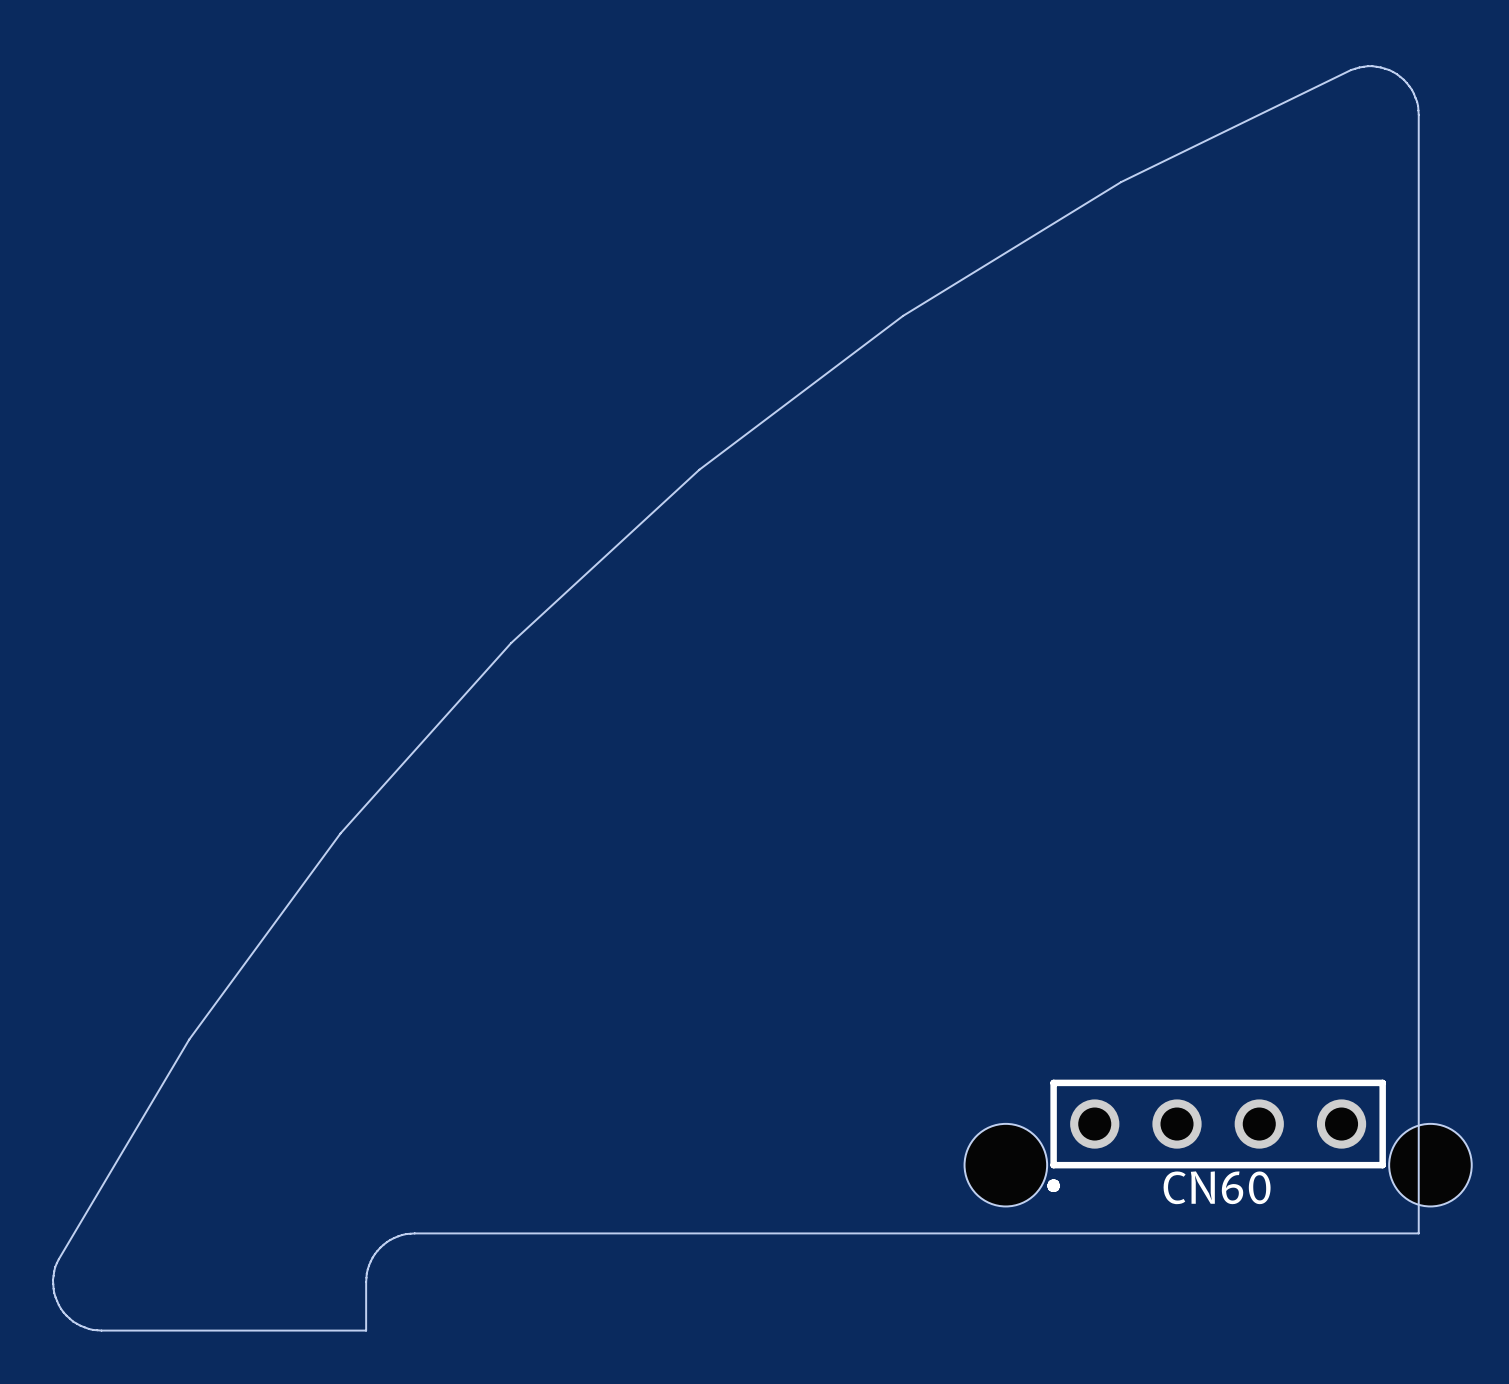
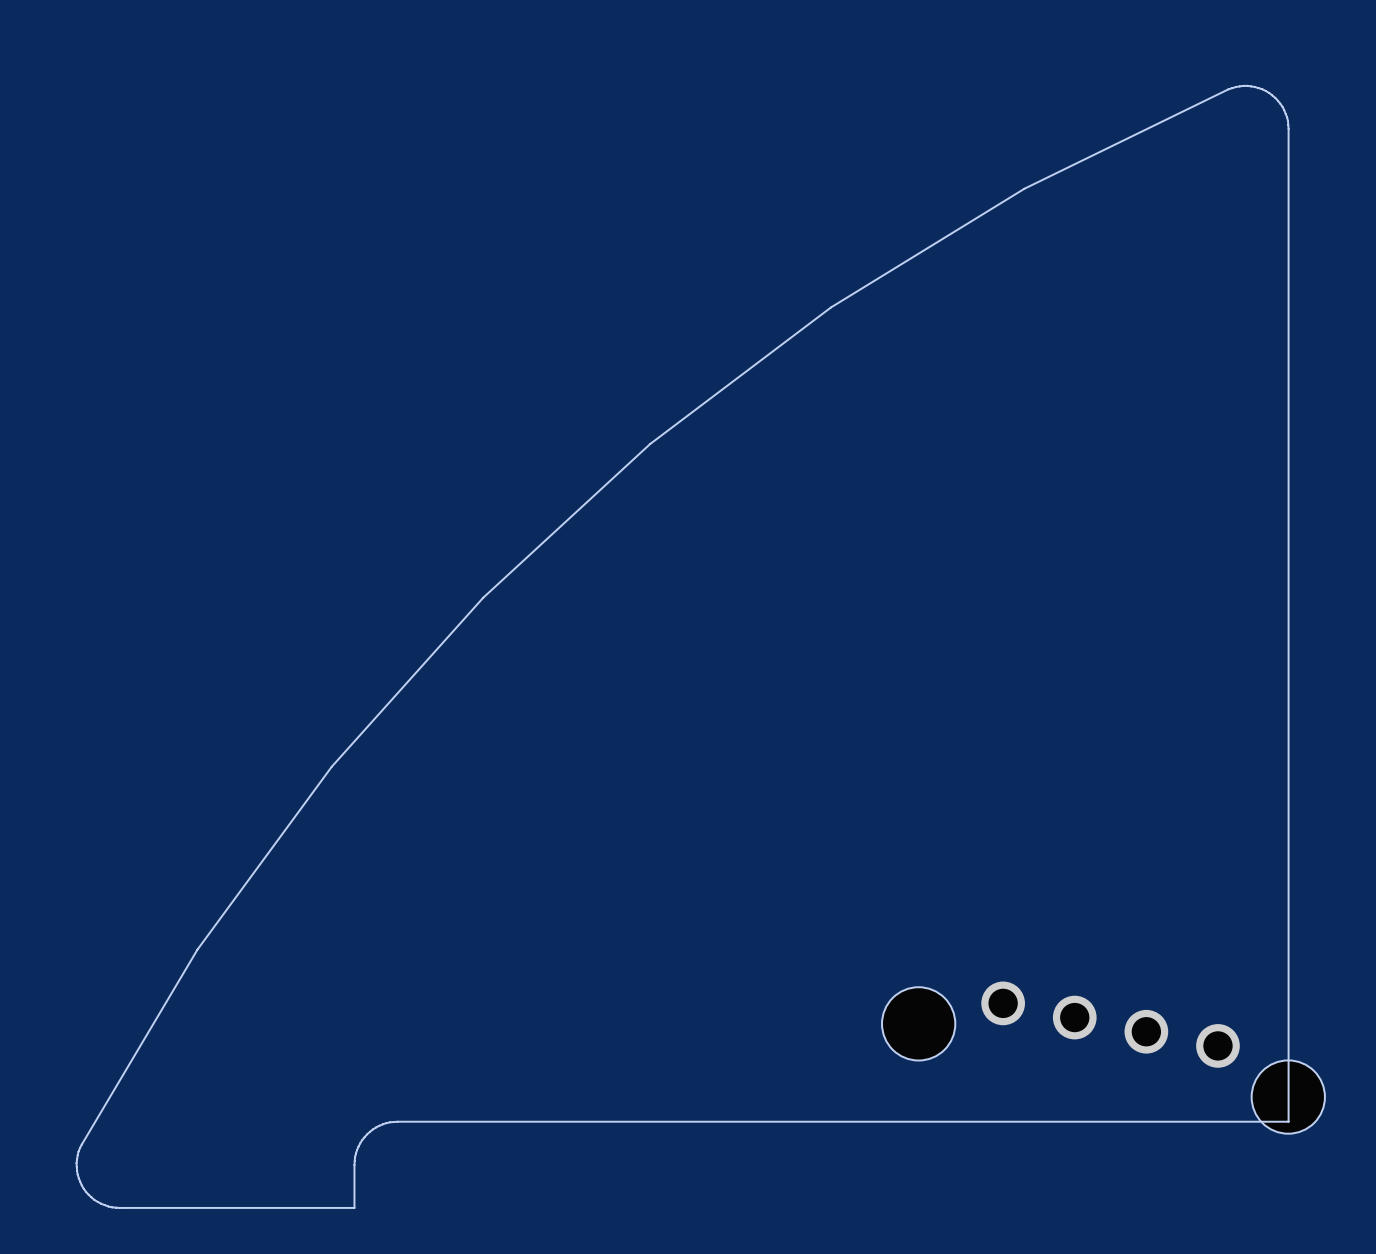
CN60 side: bottom (1218, 1143) -> top (1103, 1057)

